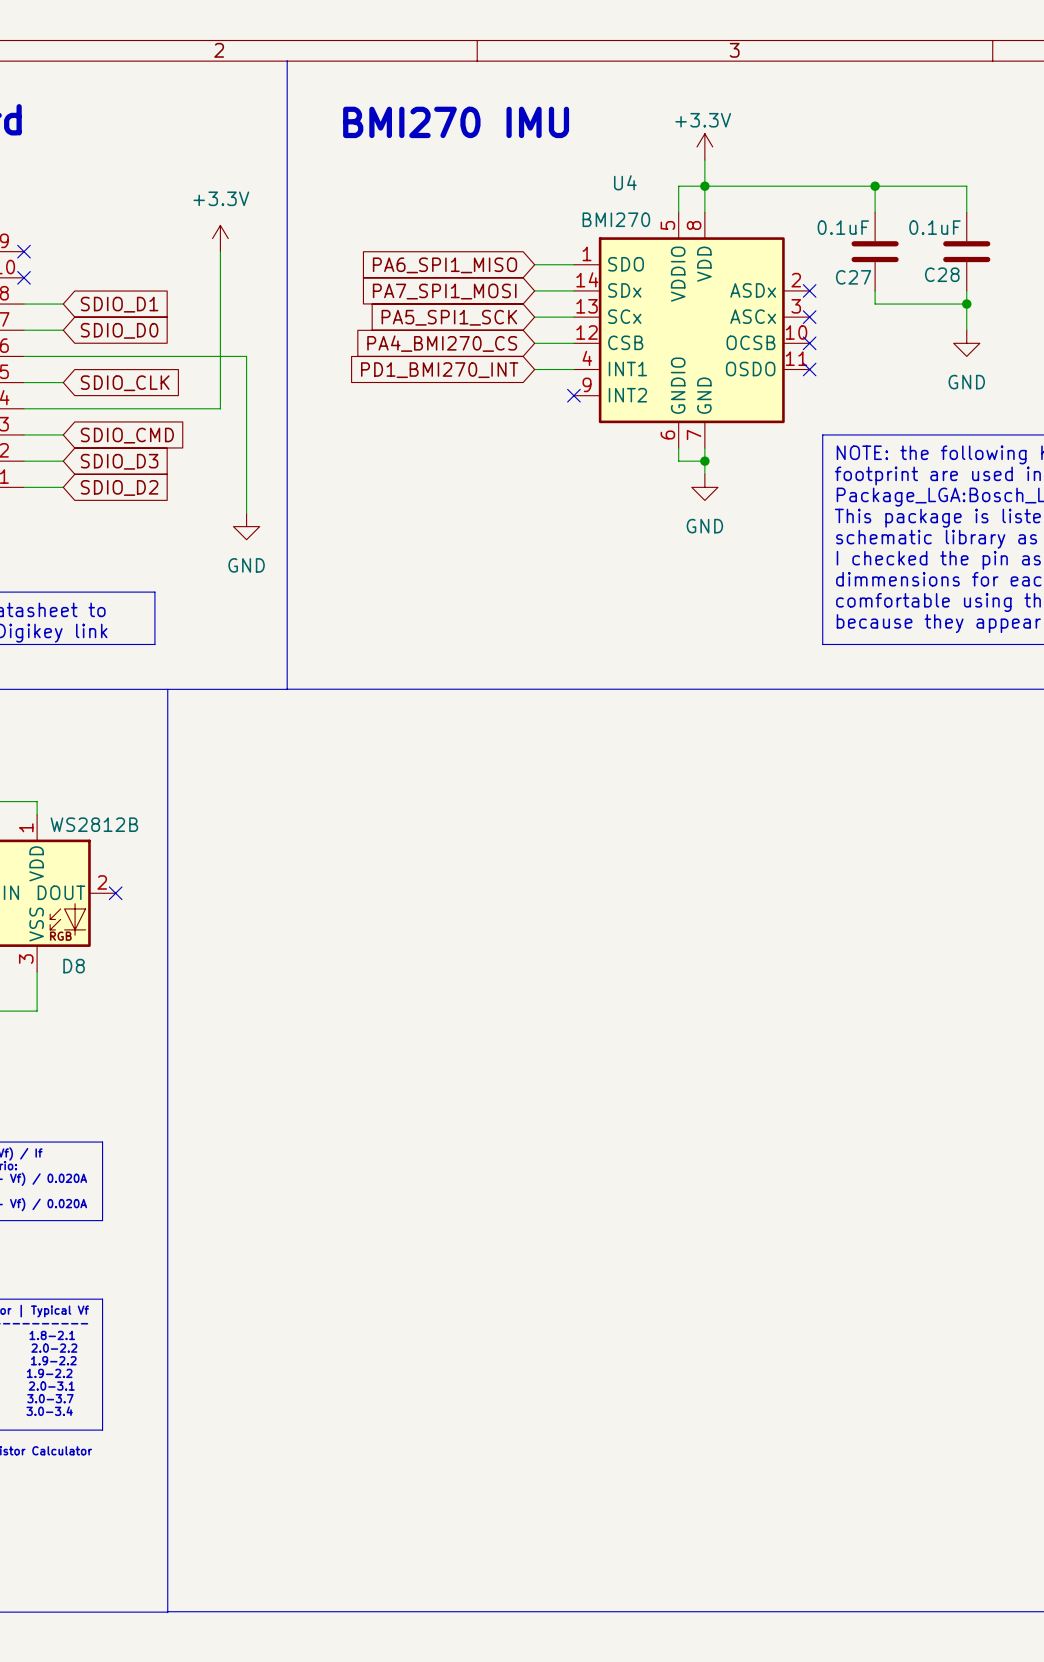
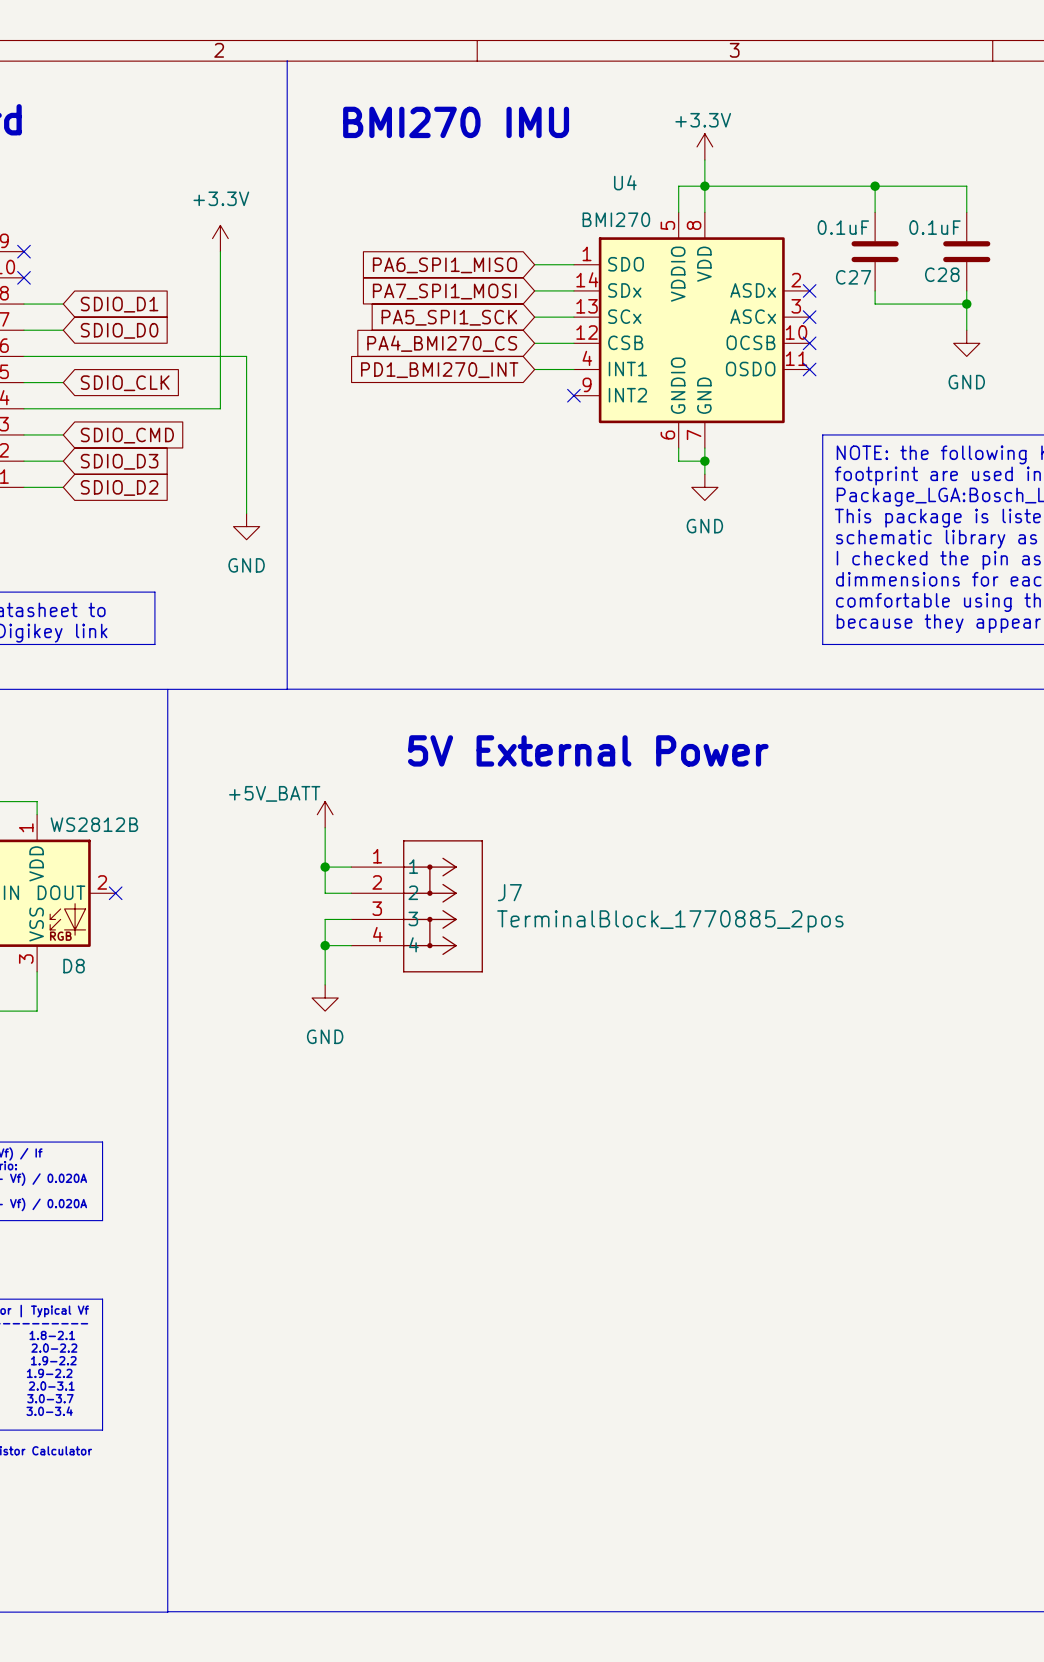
text: none -> 5V External Power (588, 750)
power symbol: none -> +5V_BATT (325, 814)
wire: none -> (325, 827) (325, 893) (351, 893)
wire: none -> (325, 867) (351, 867)
junction: none -> (325, 867)
J7: none -> TerminalBlock_1770885_2pos (417, 906)
wire: none -> (351, 919) (325, 919) (325, 984)
wire: none -> (325, 945) (351, 945)
junction: none -> (325, 945)
power symbol: none -> GND (325, 998)

